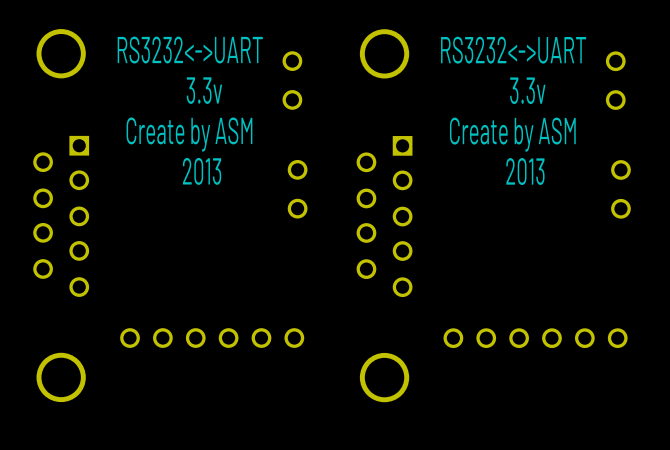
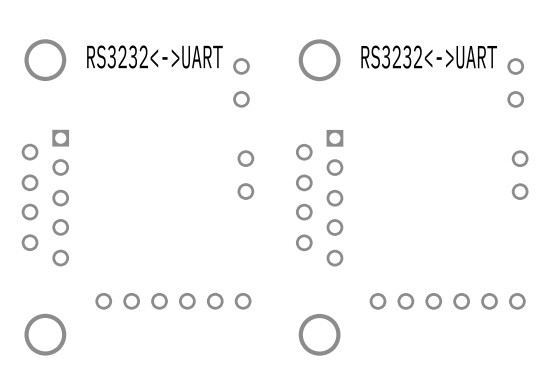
text: 3.3v (204, 90) -> none
text: 3.3v (527, 90) -> none
text: Create by ASM (189, 134) -> none
text: Create by ASM (512, 134) -> none
text: 2013 (202, 171) -> none
text: 2013 (525, 171) -> none

